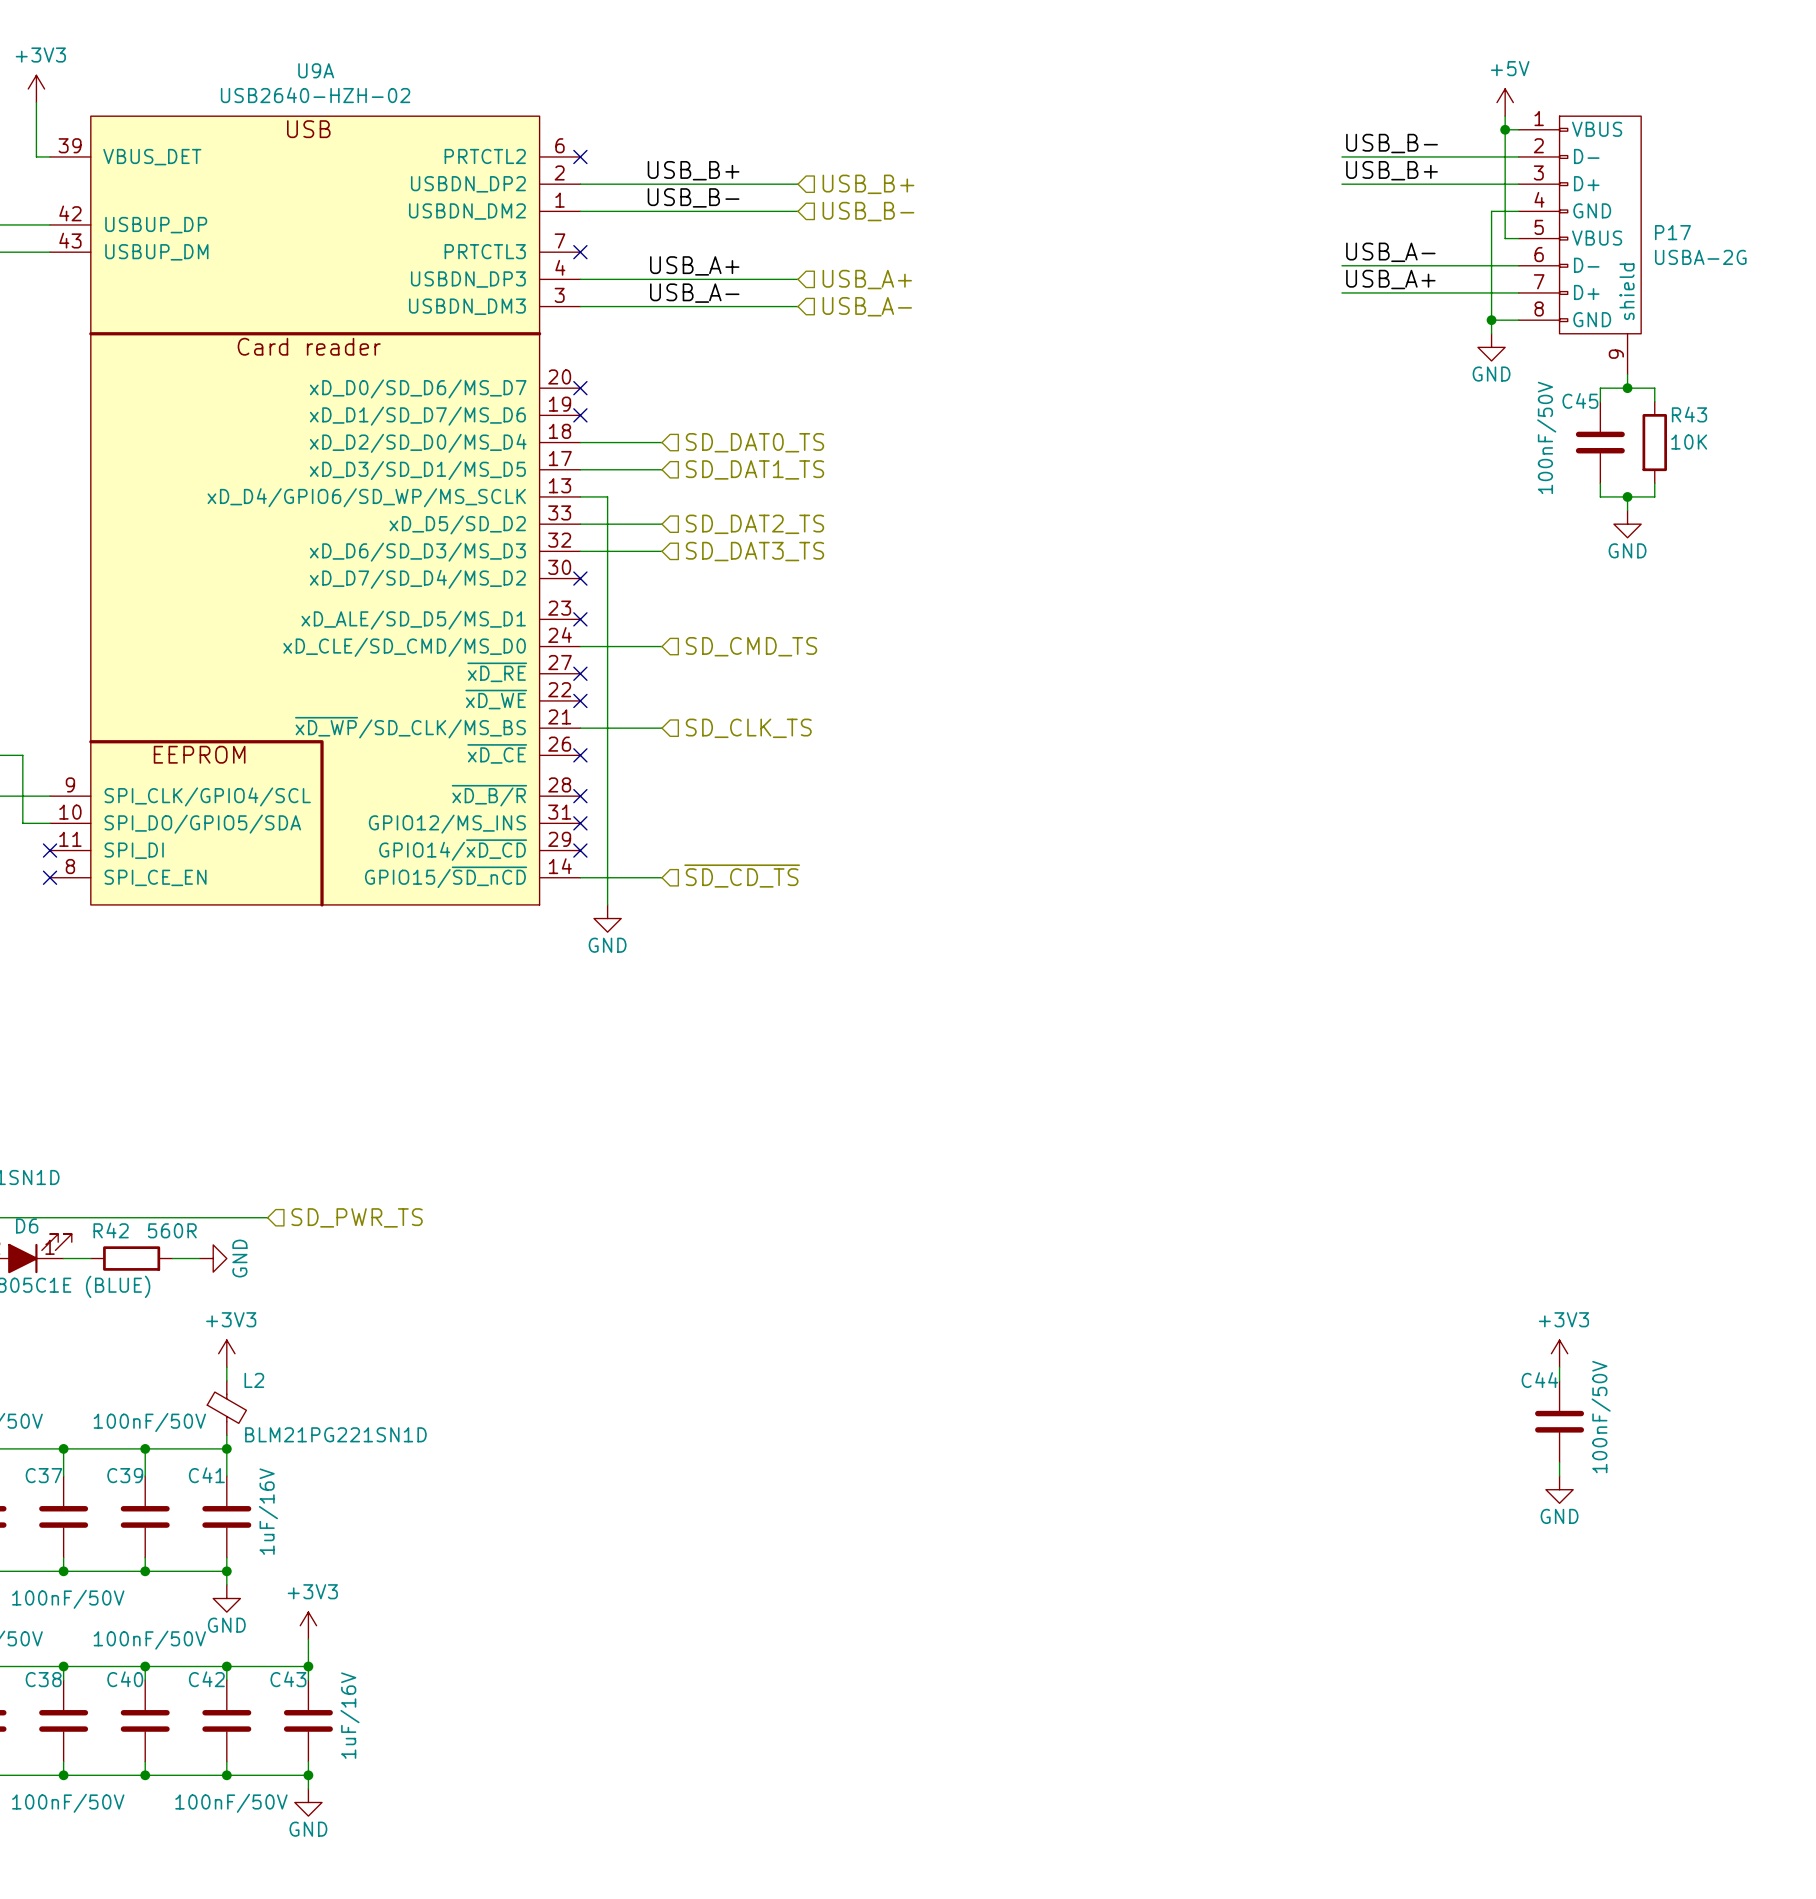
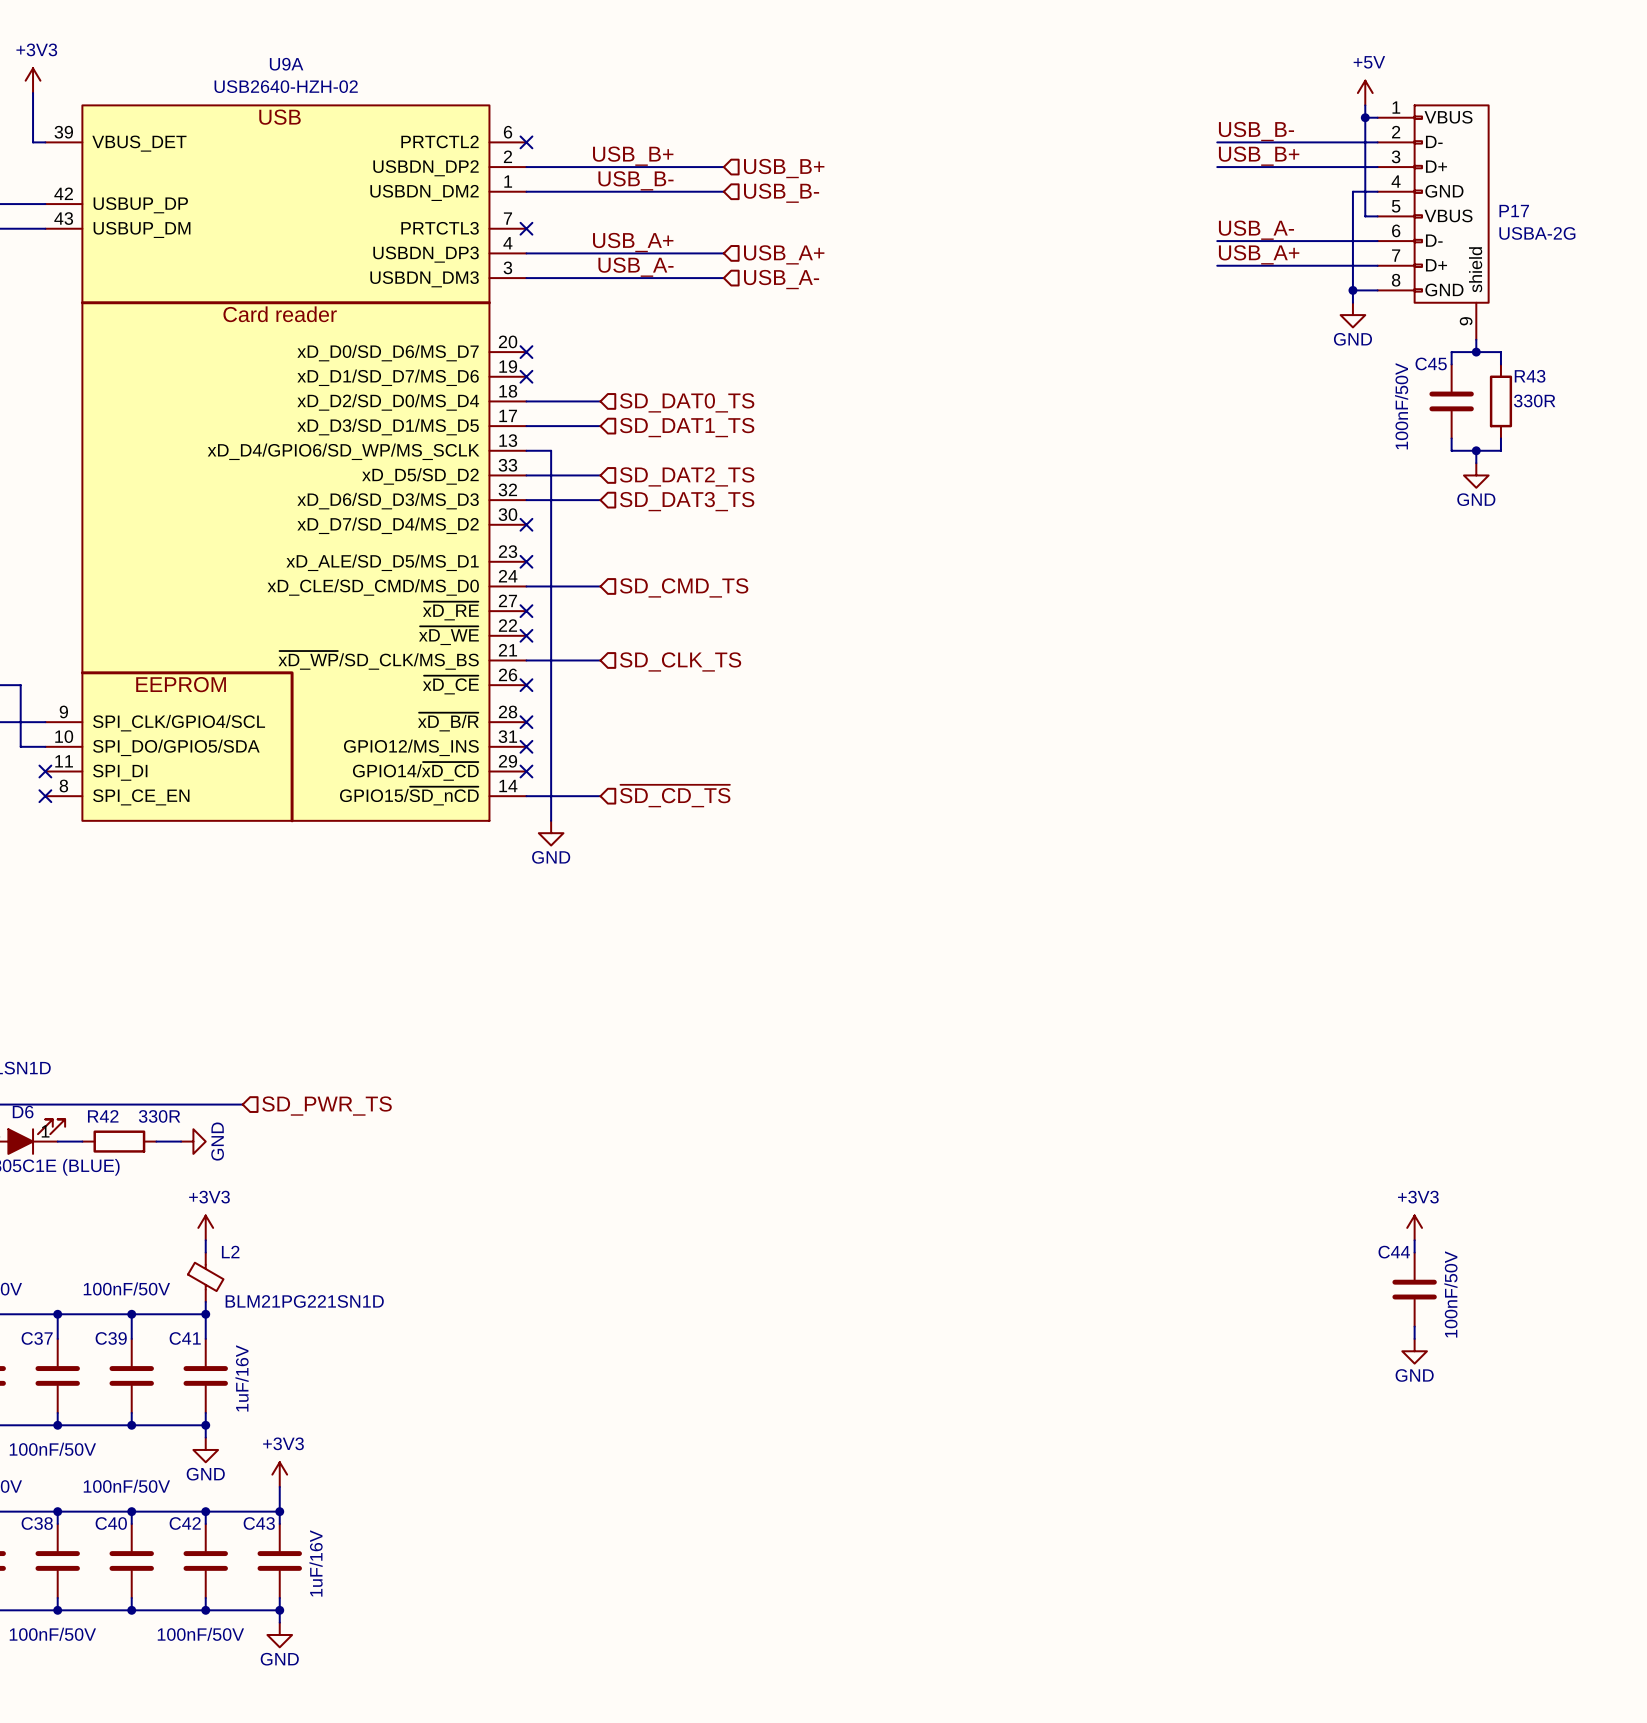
R43 value: 10K (1689, 442) -> 330R (1534, 400)
R42 value: 560R (172, 1230) -> 330R (159, 1116)

